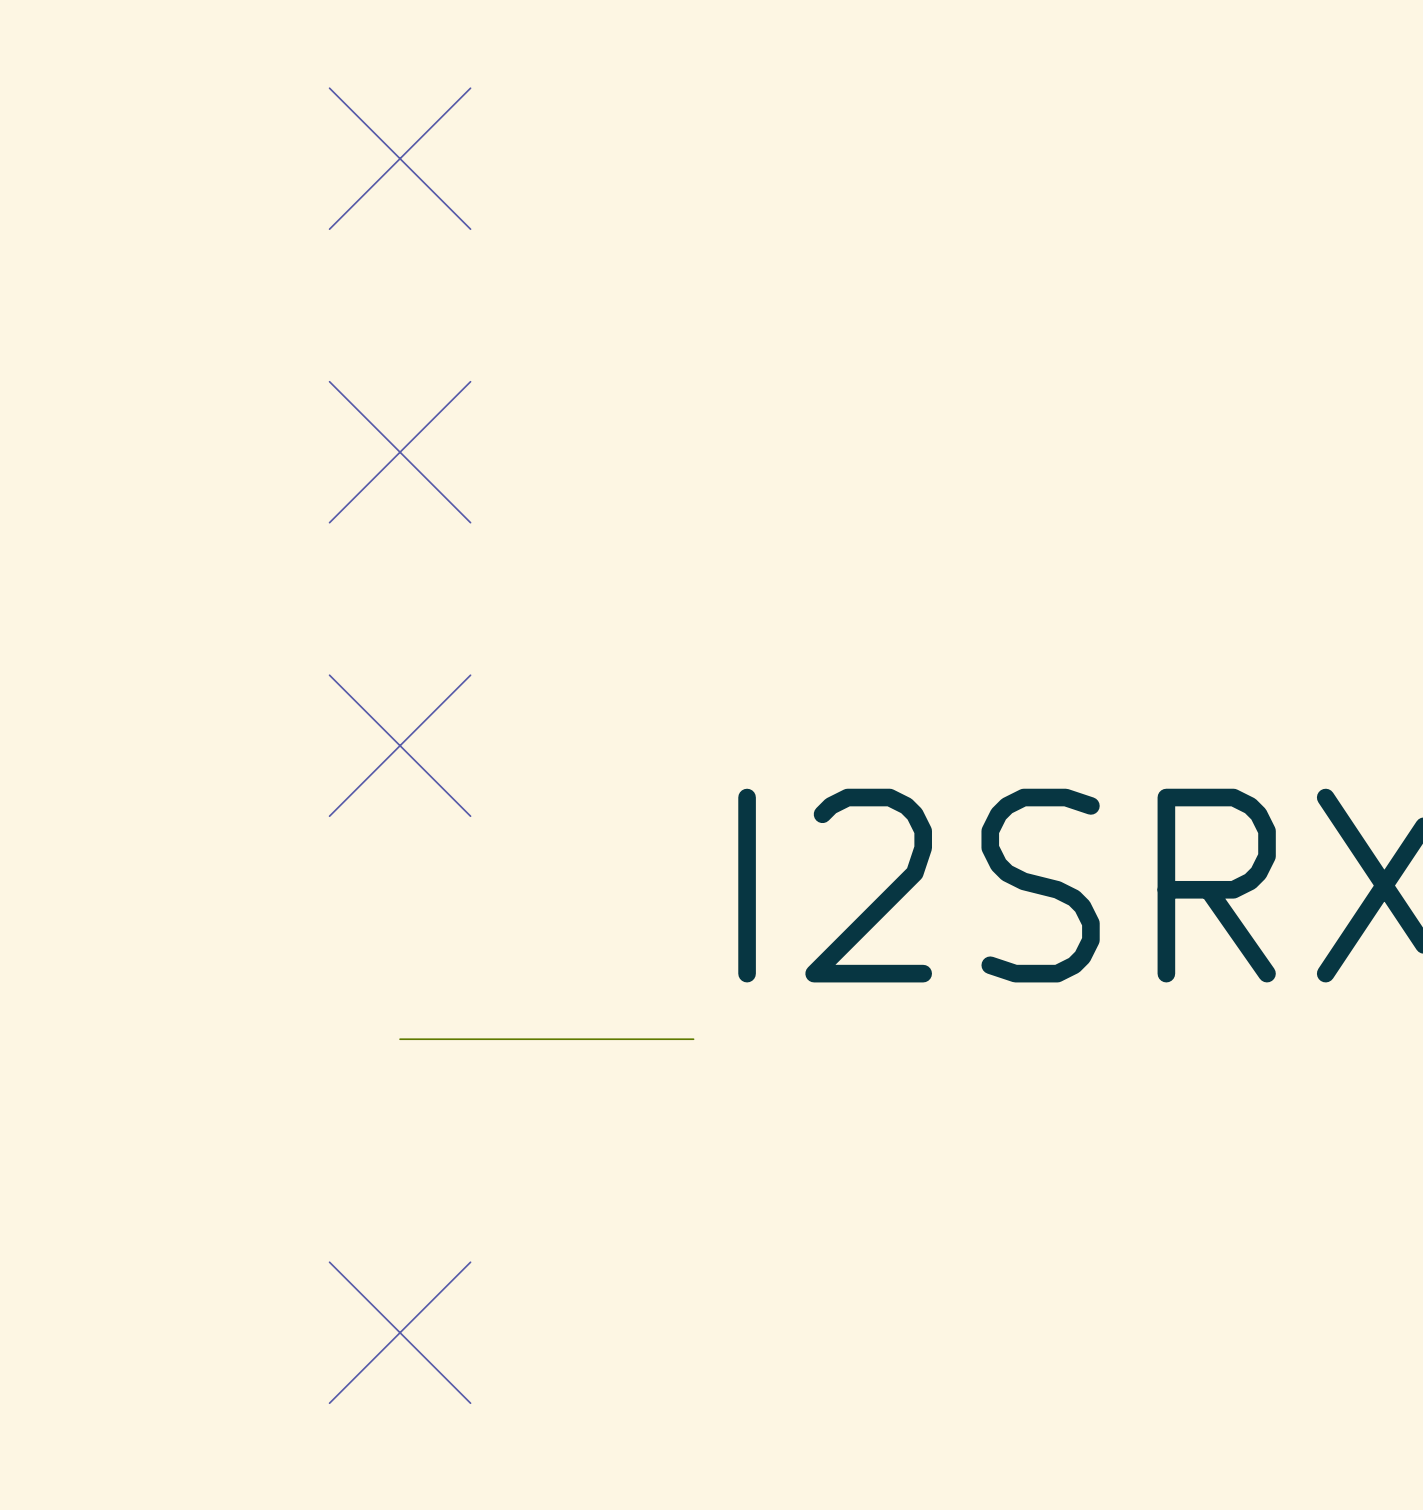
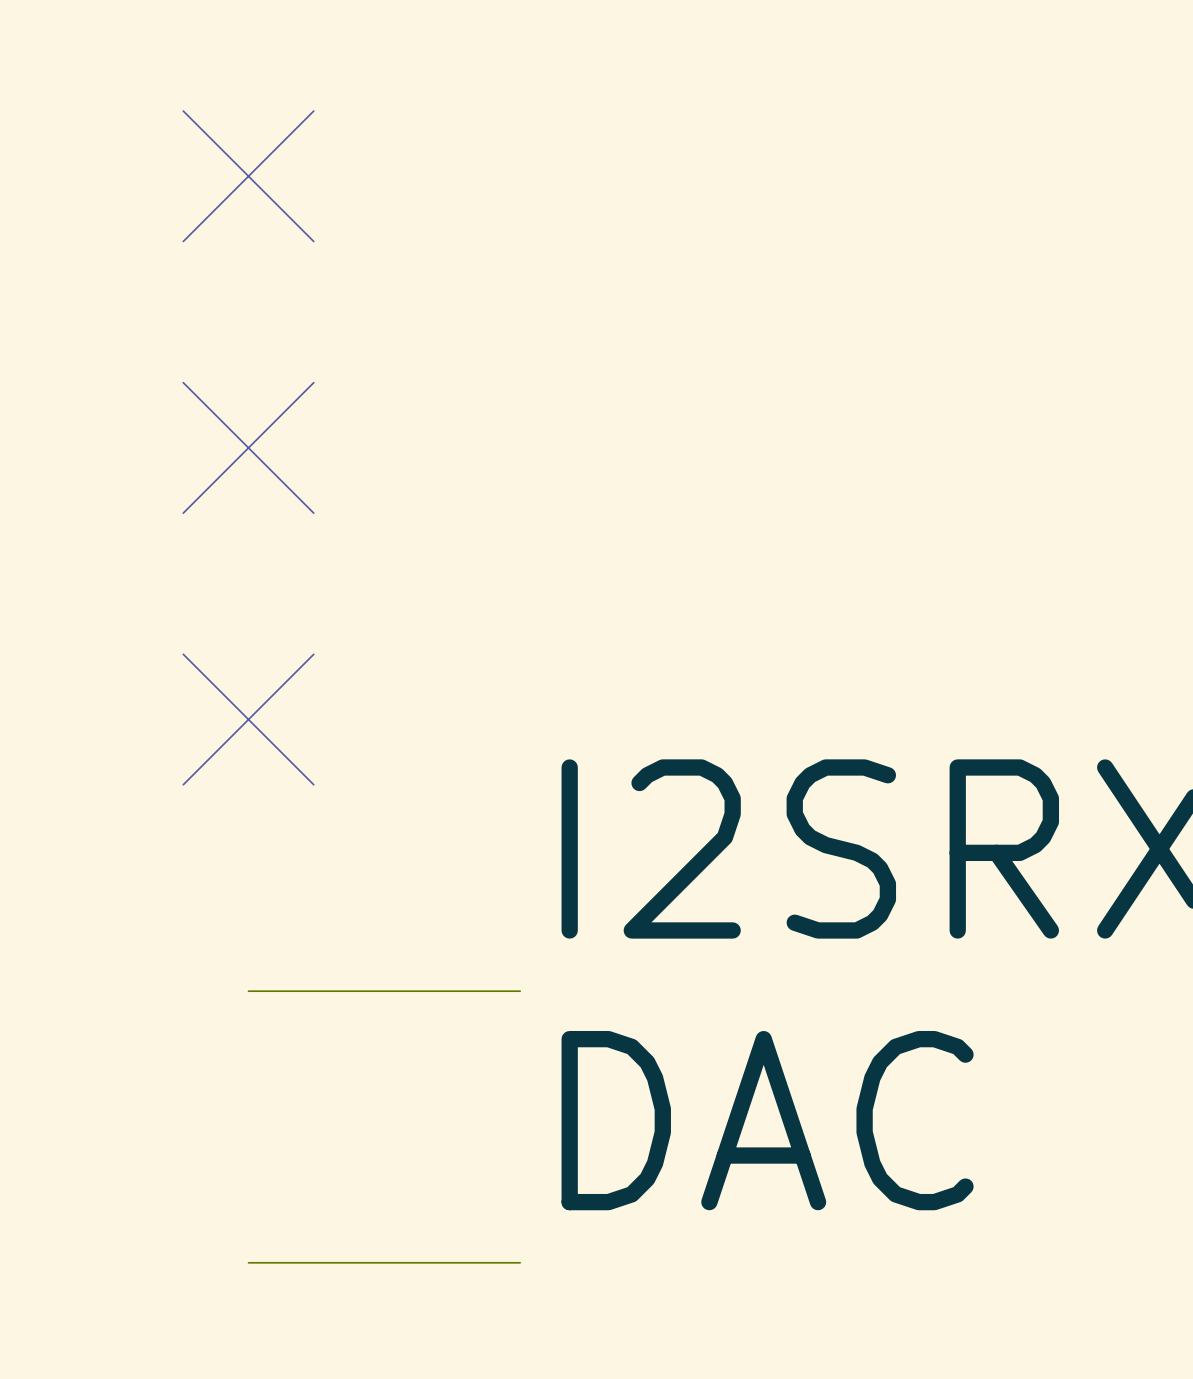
label: none -> DAC (767, 1120)
wire: none -> (248, 1262) (520, 1262)
no-connect mark: (400, 1332) -> none

